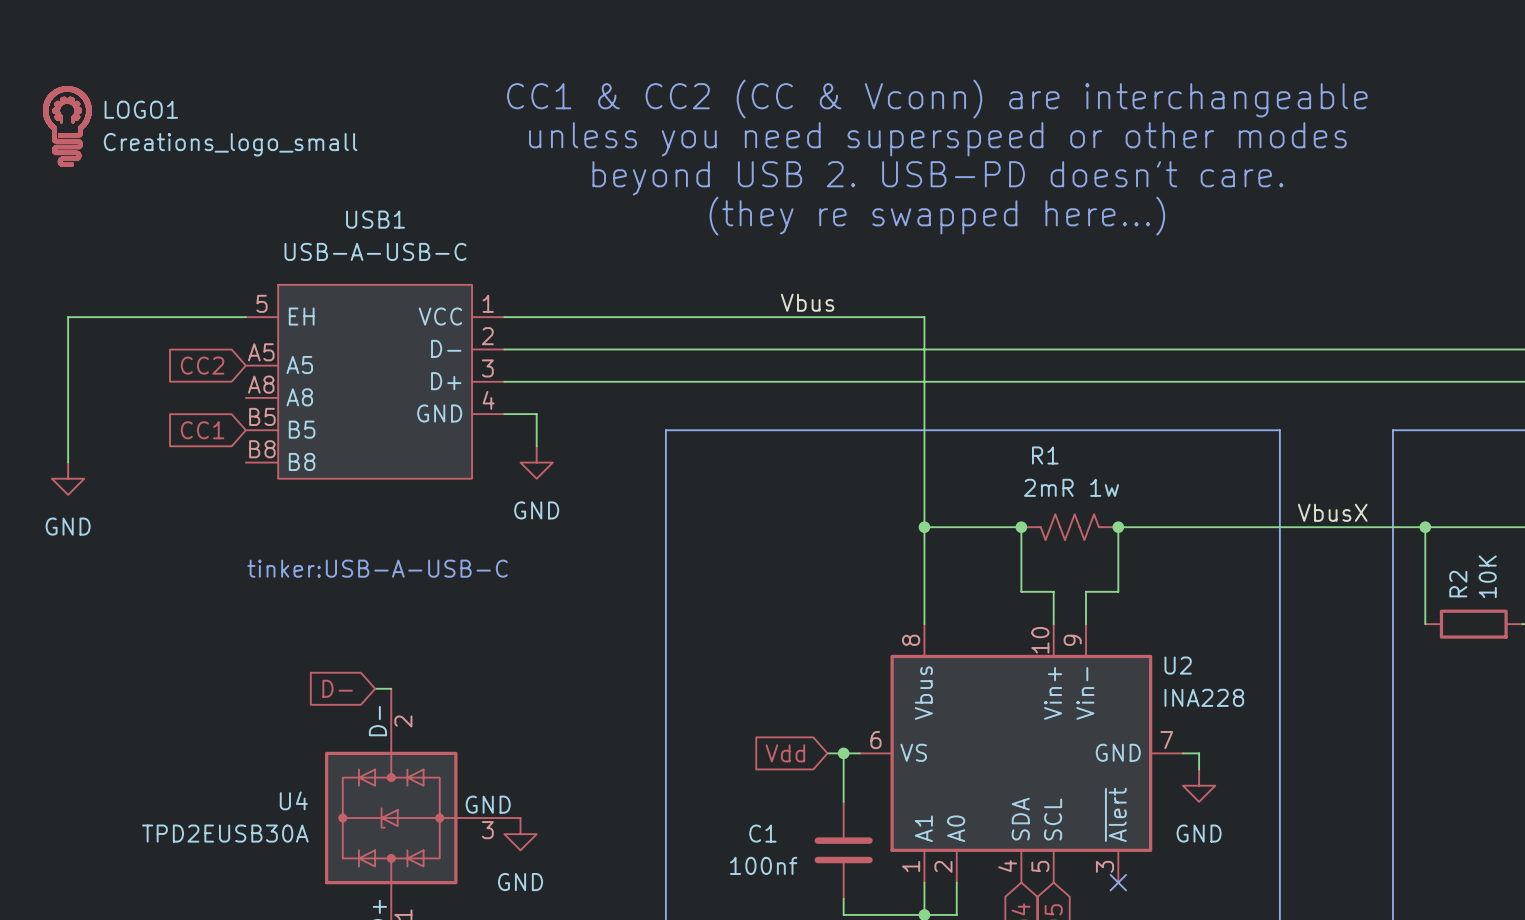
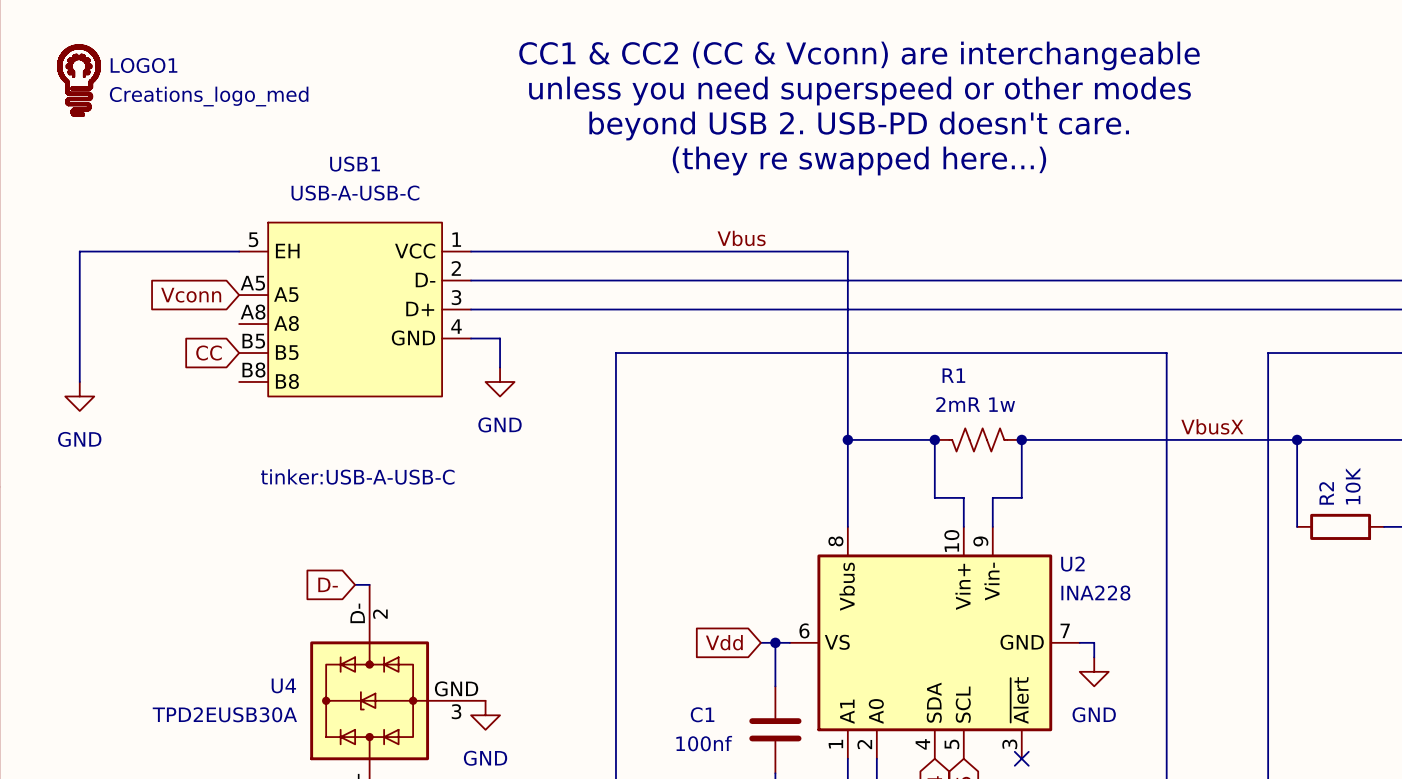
LOGO1 value: Creations_logo_small (230, 144) -> Creations_logo_med (209, 96)
global label: CC2 (202, 365) -> Vconn (191, 295)
global label: CC1 (202, 430) -> CC (209, 353)

